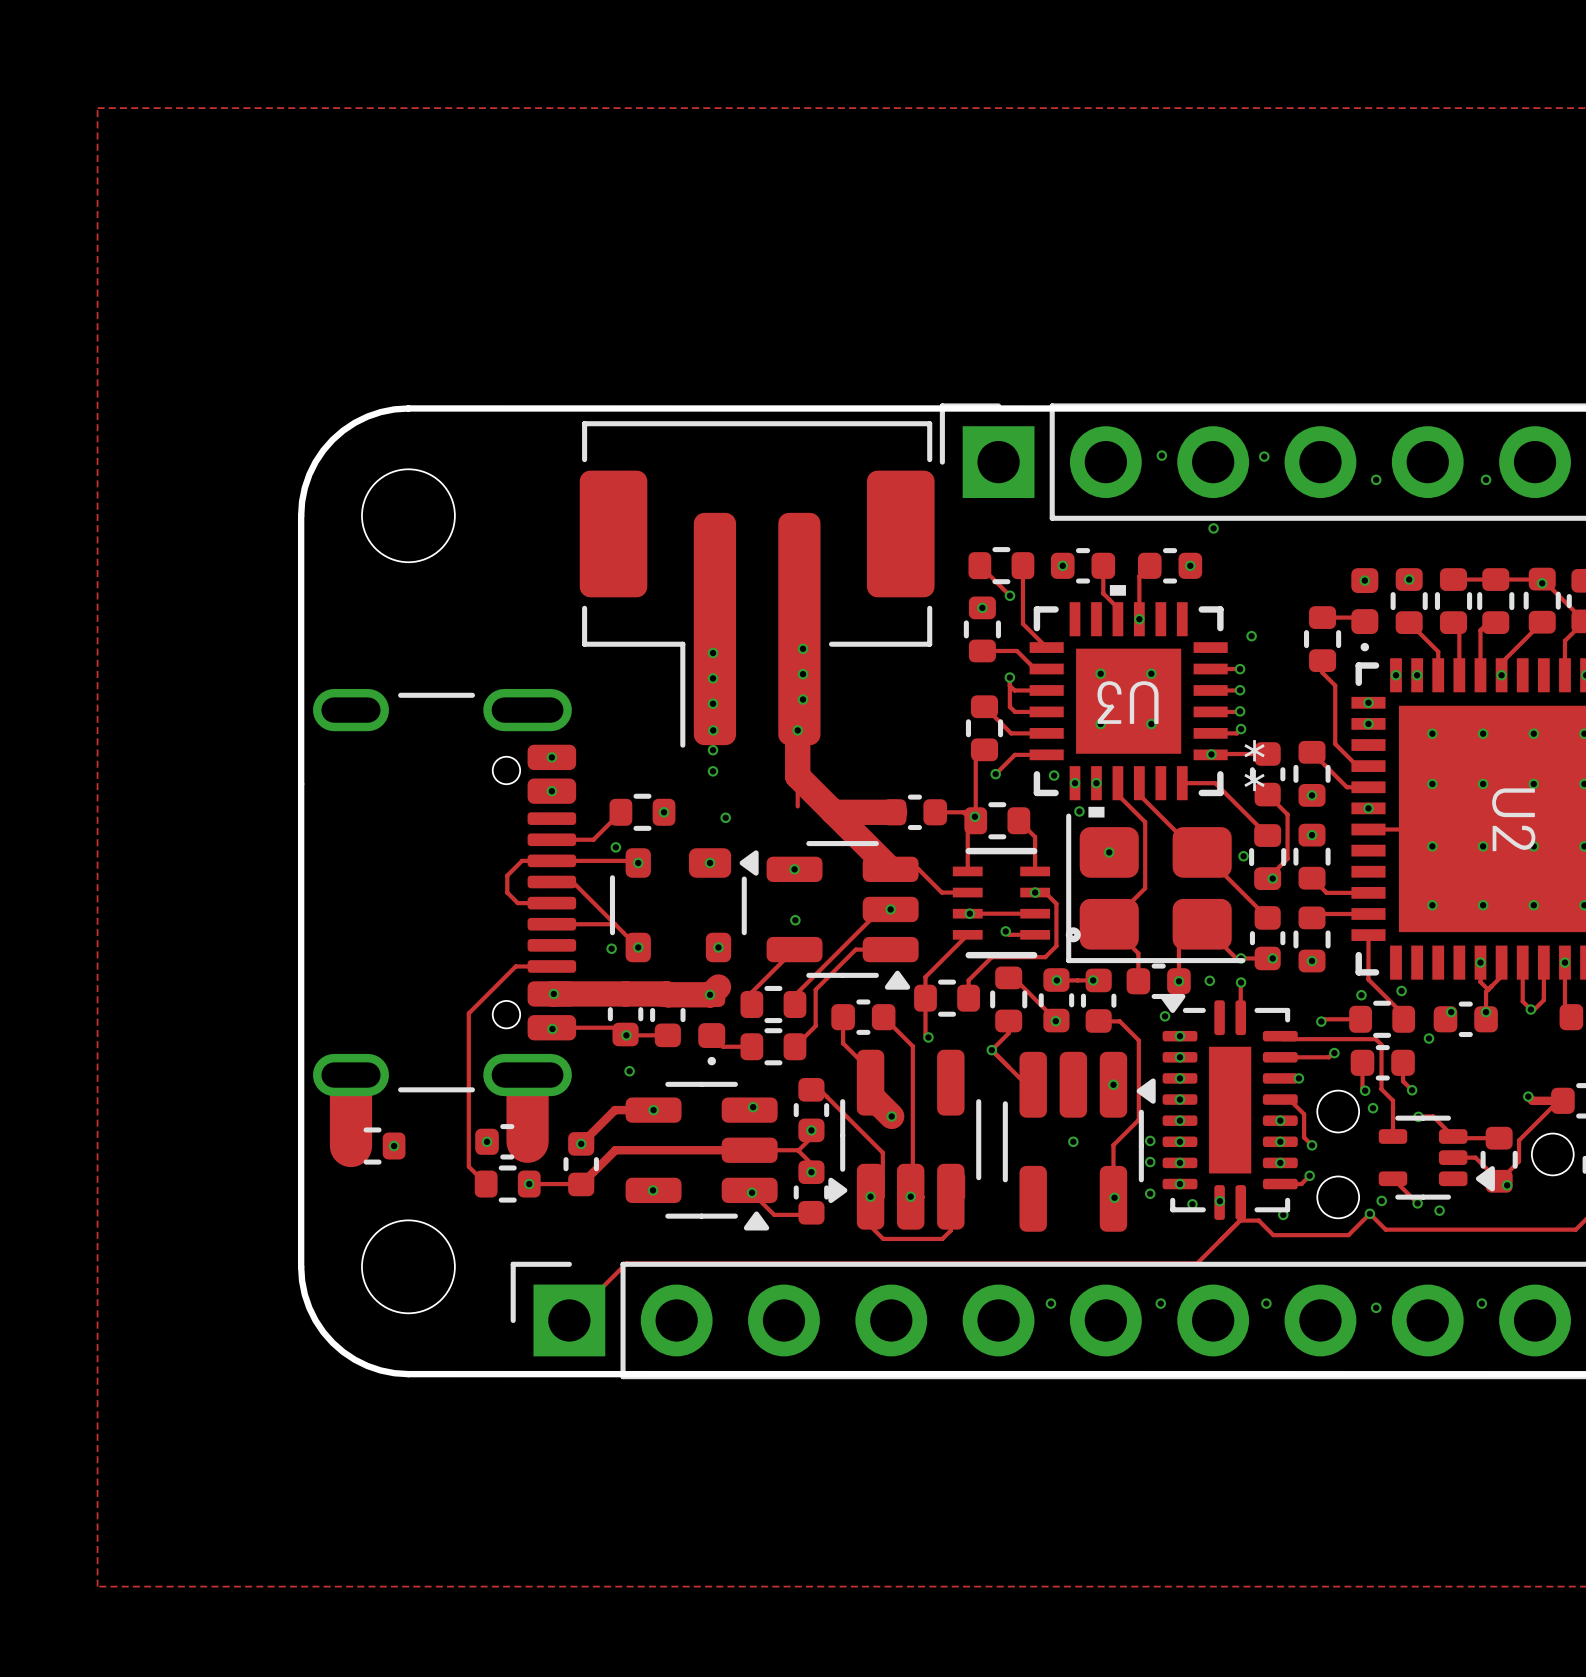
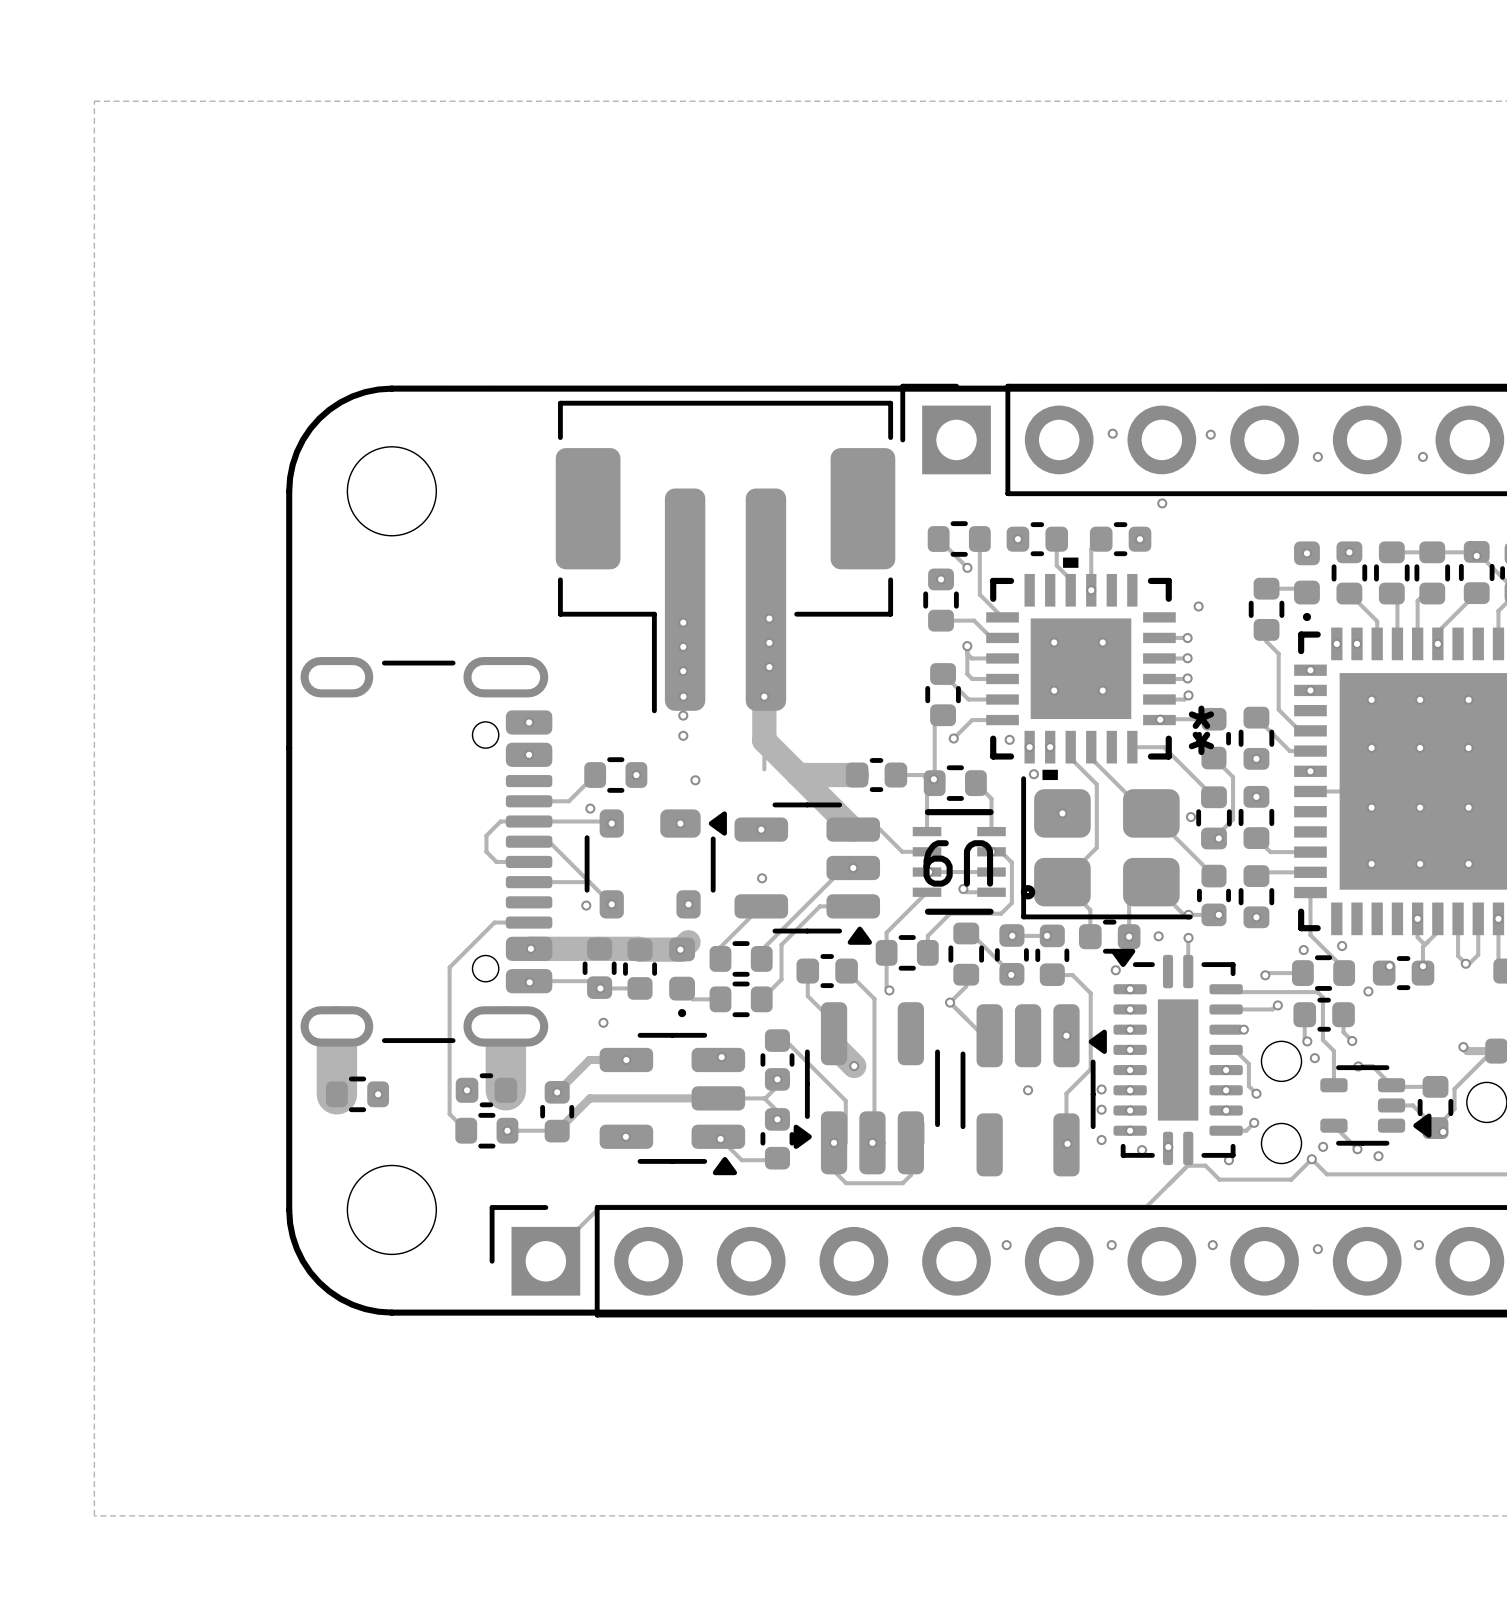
U3 name: U3 (1128, 702) -> none
U2 name: U2 (1513, 819) -> none
U9 name: none -> U9 (958, 863)

